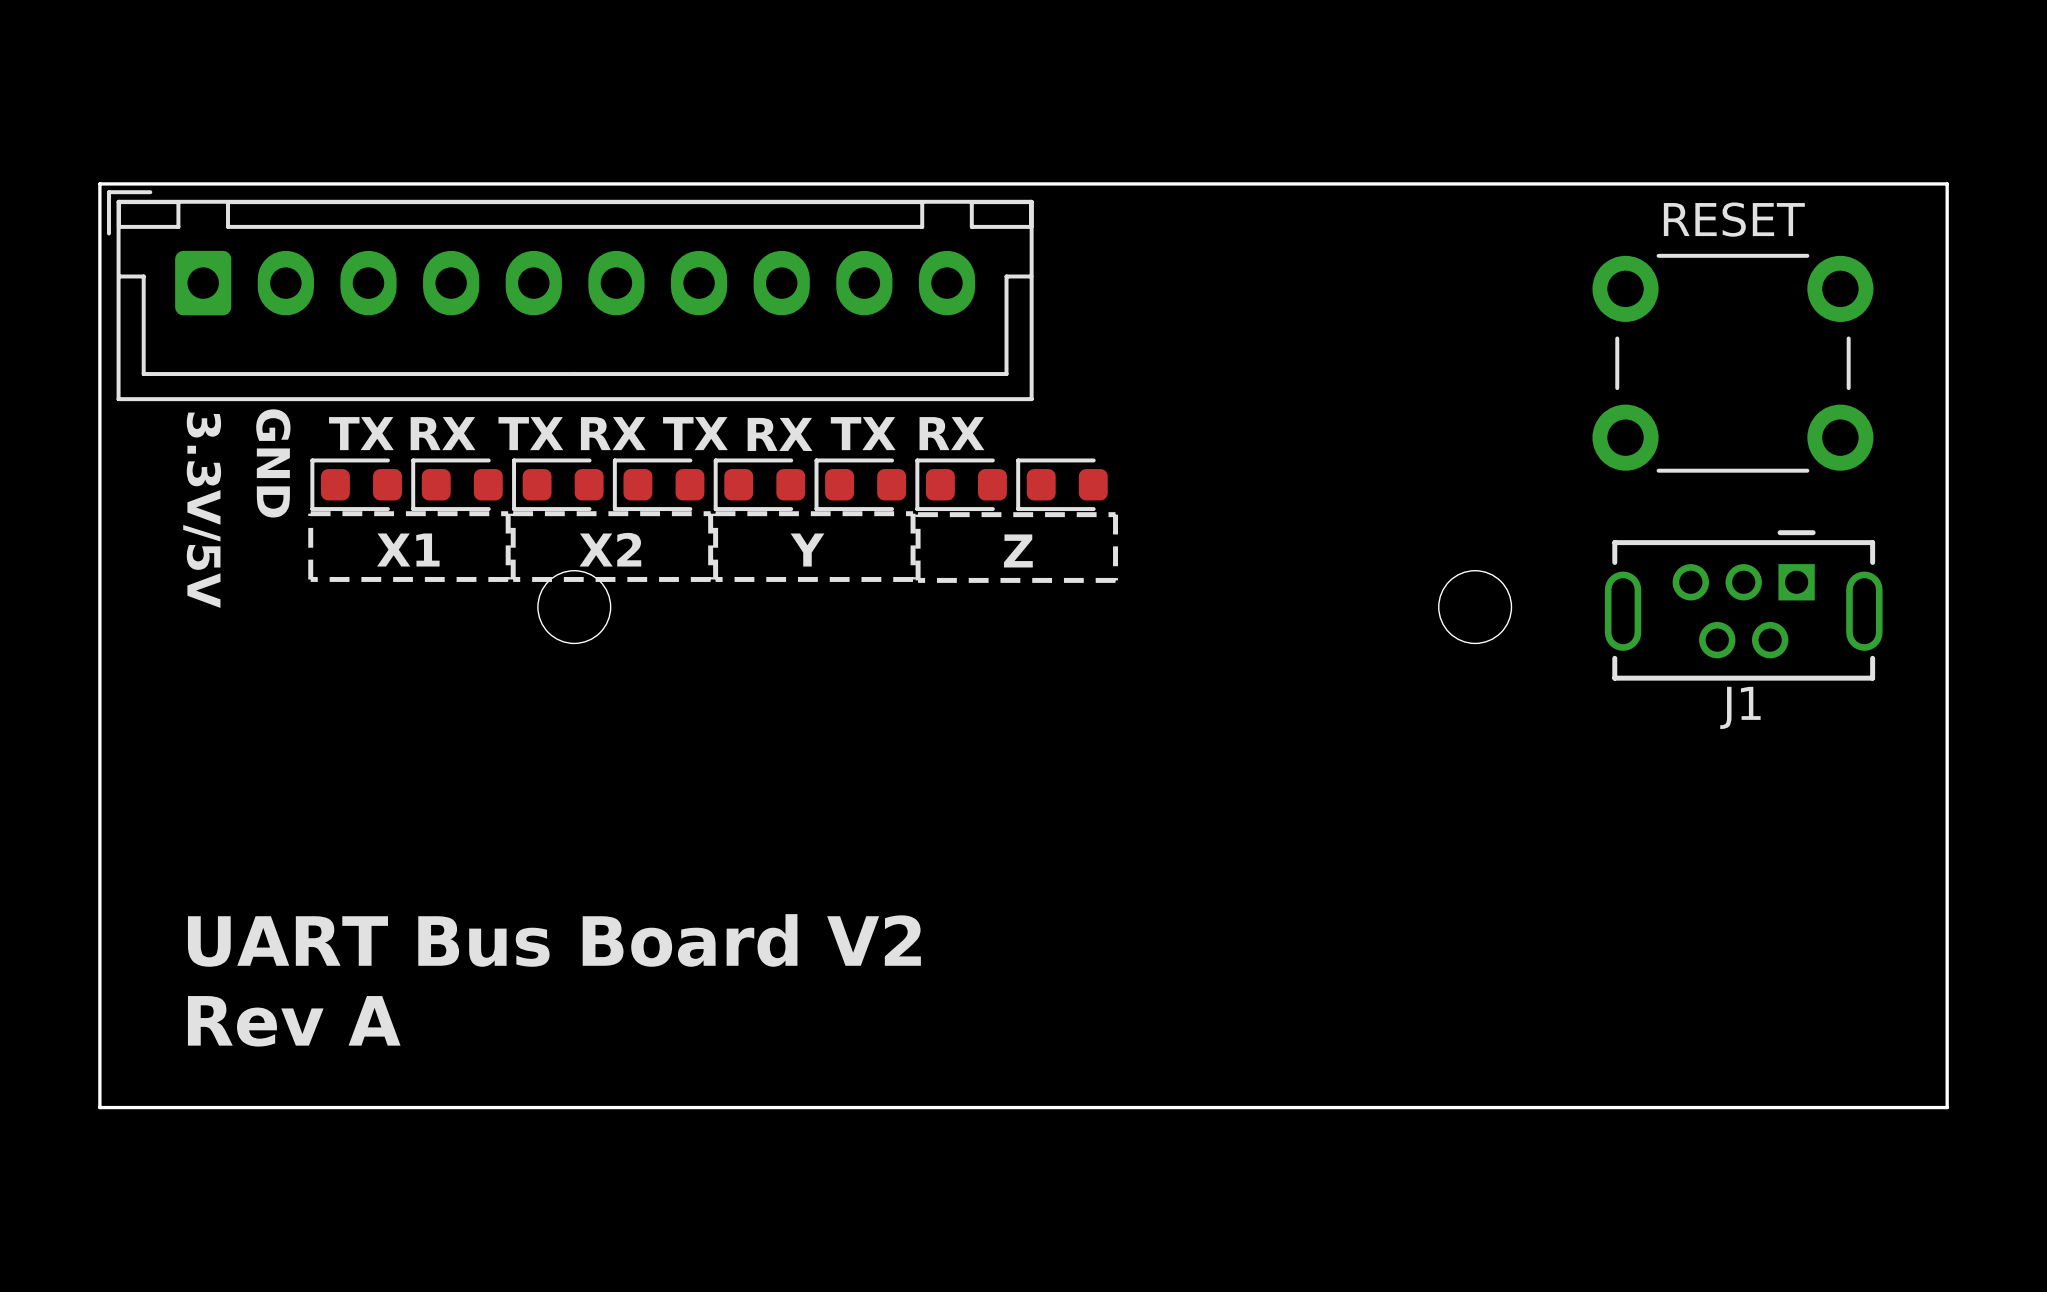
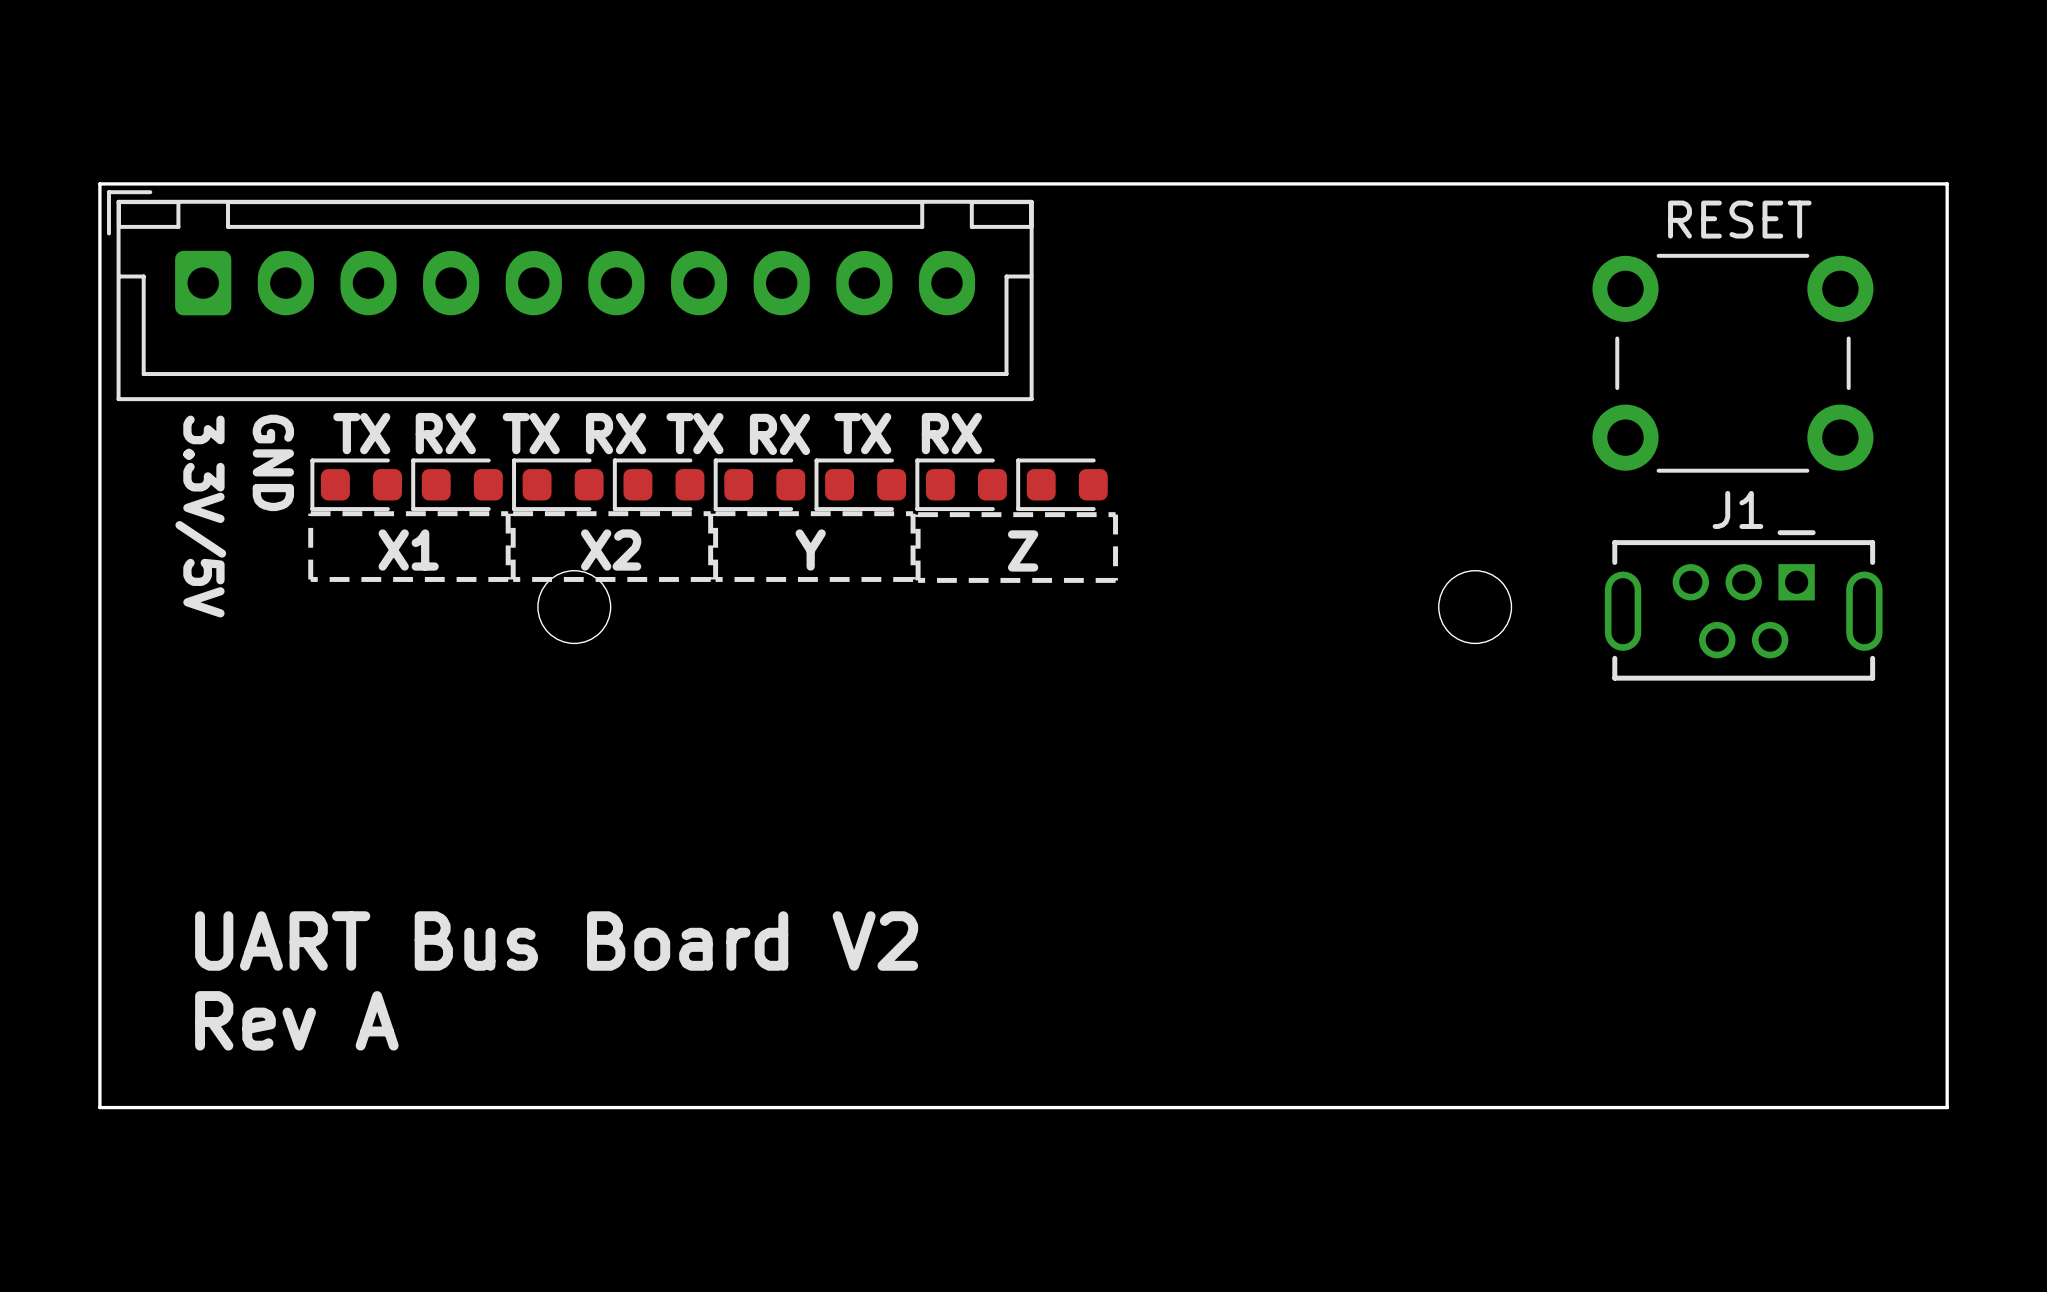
J1 name position: J1 (1740, 707) -> J1 (1737, 509)

